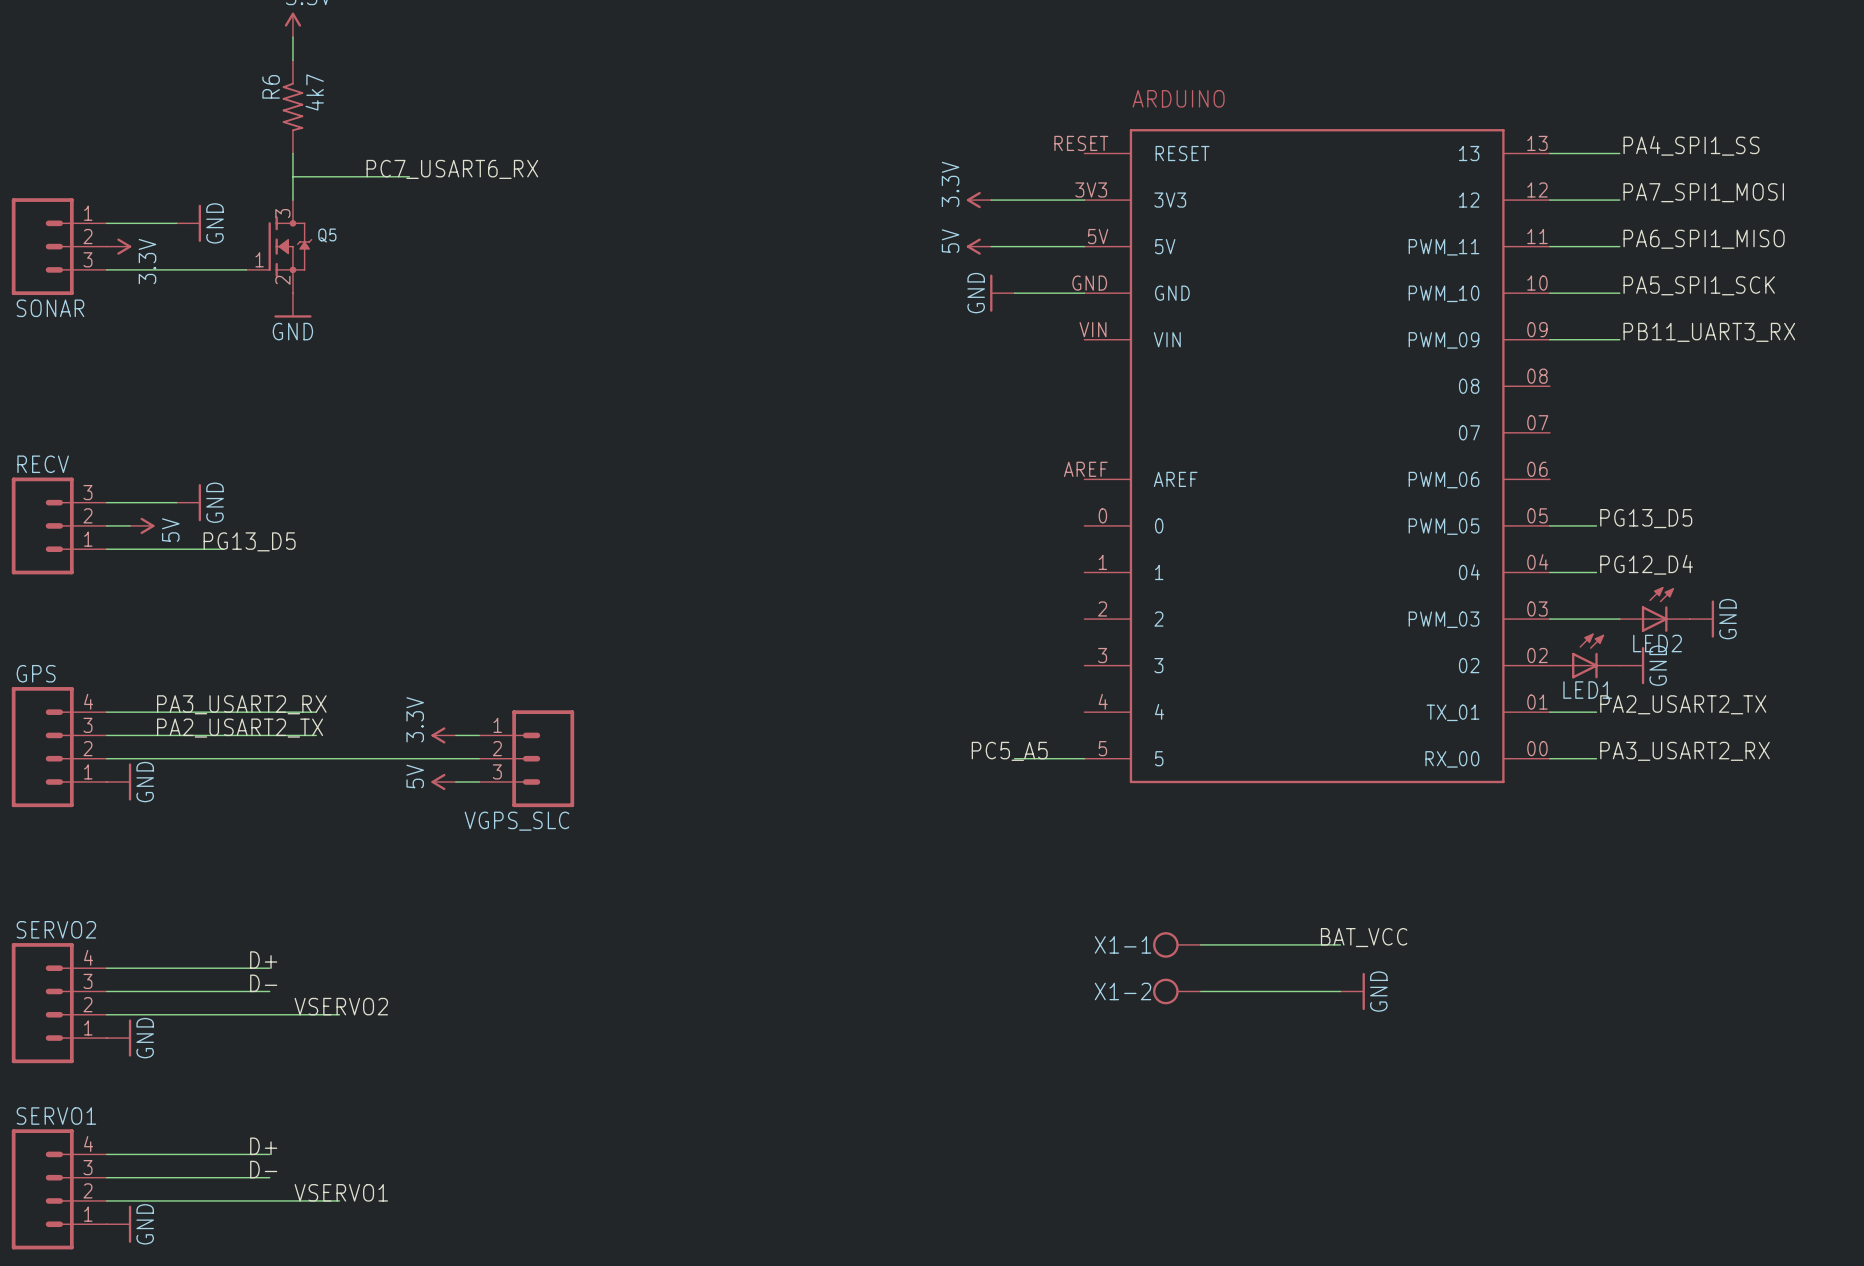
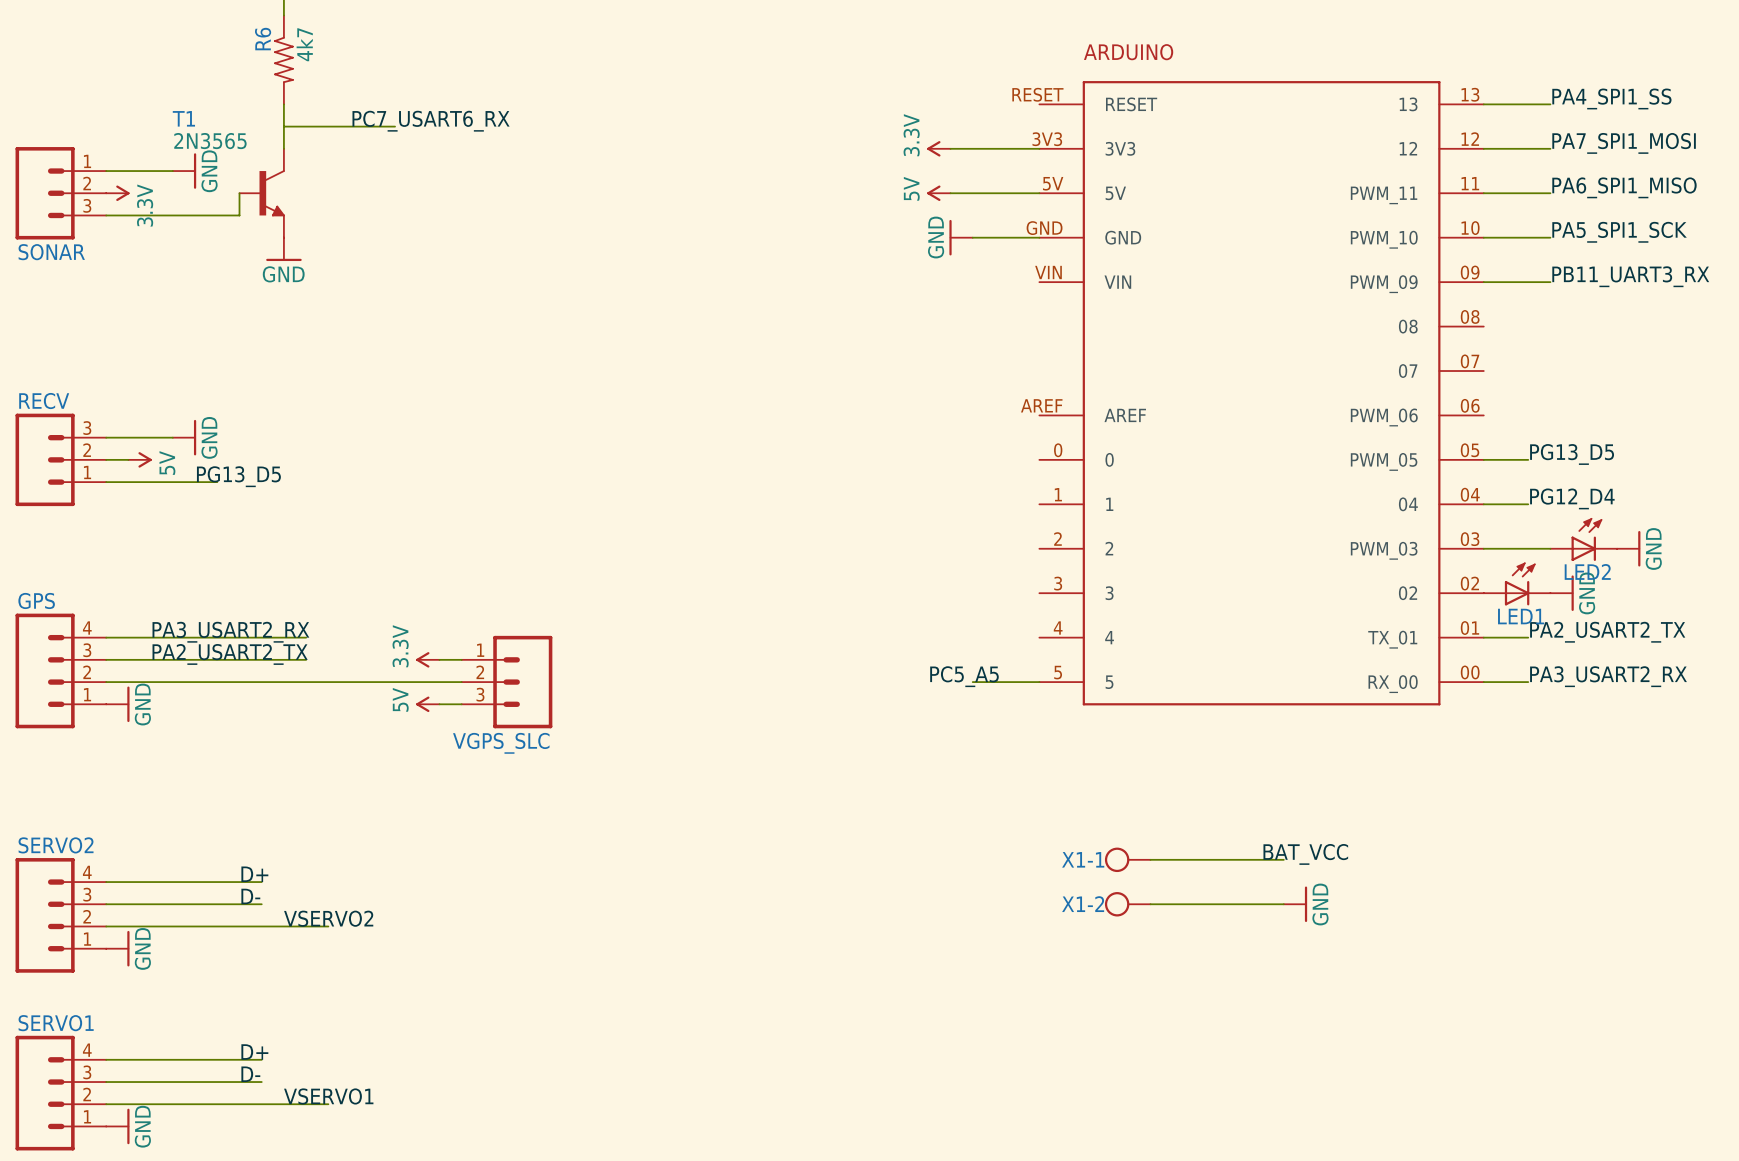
wire: none -> (239, 193) (239, 215)
T1: none -> 2N3565 (262, 193)
Q5: (279, 246) -> none

